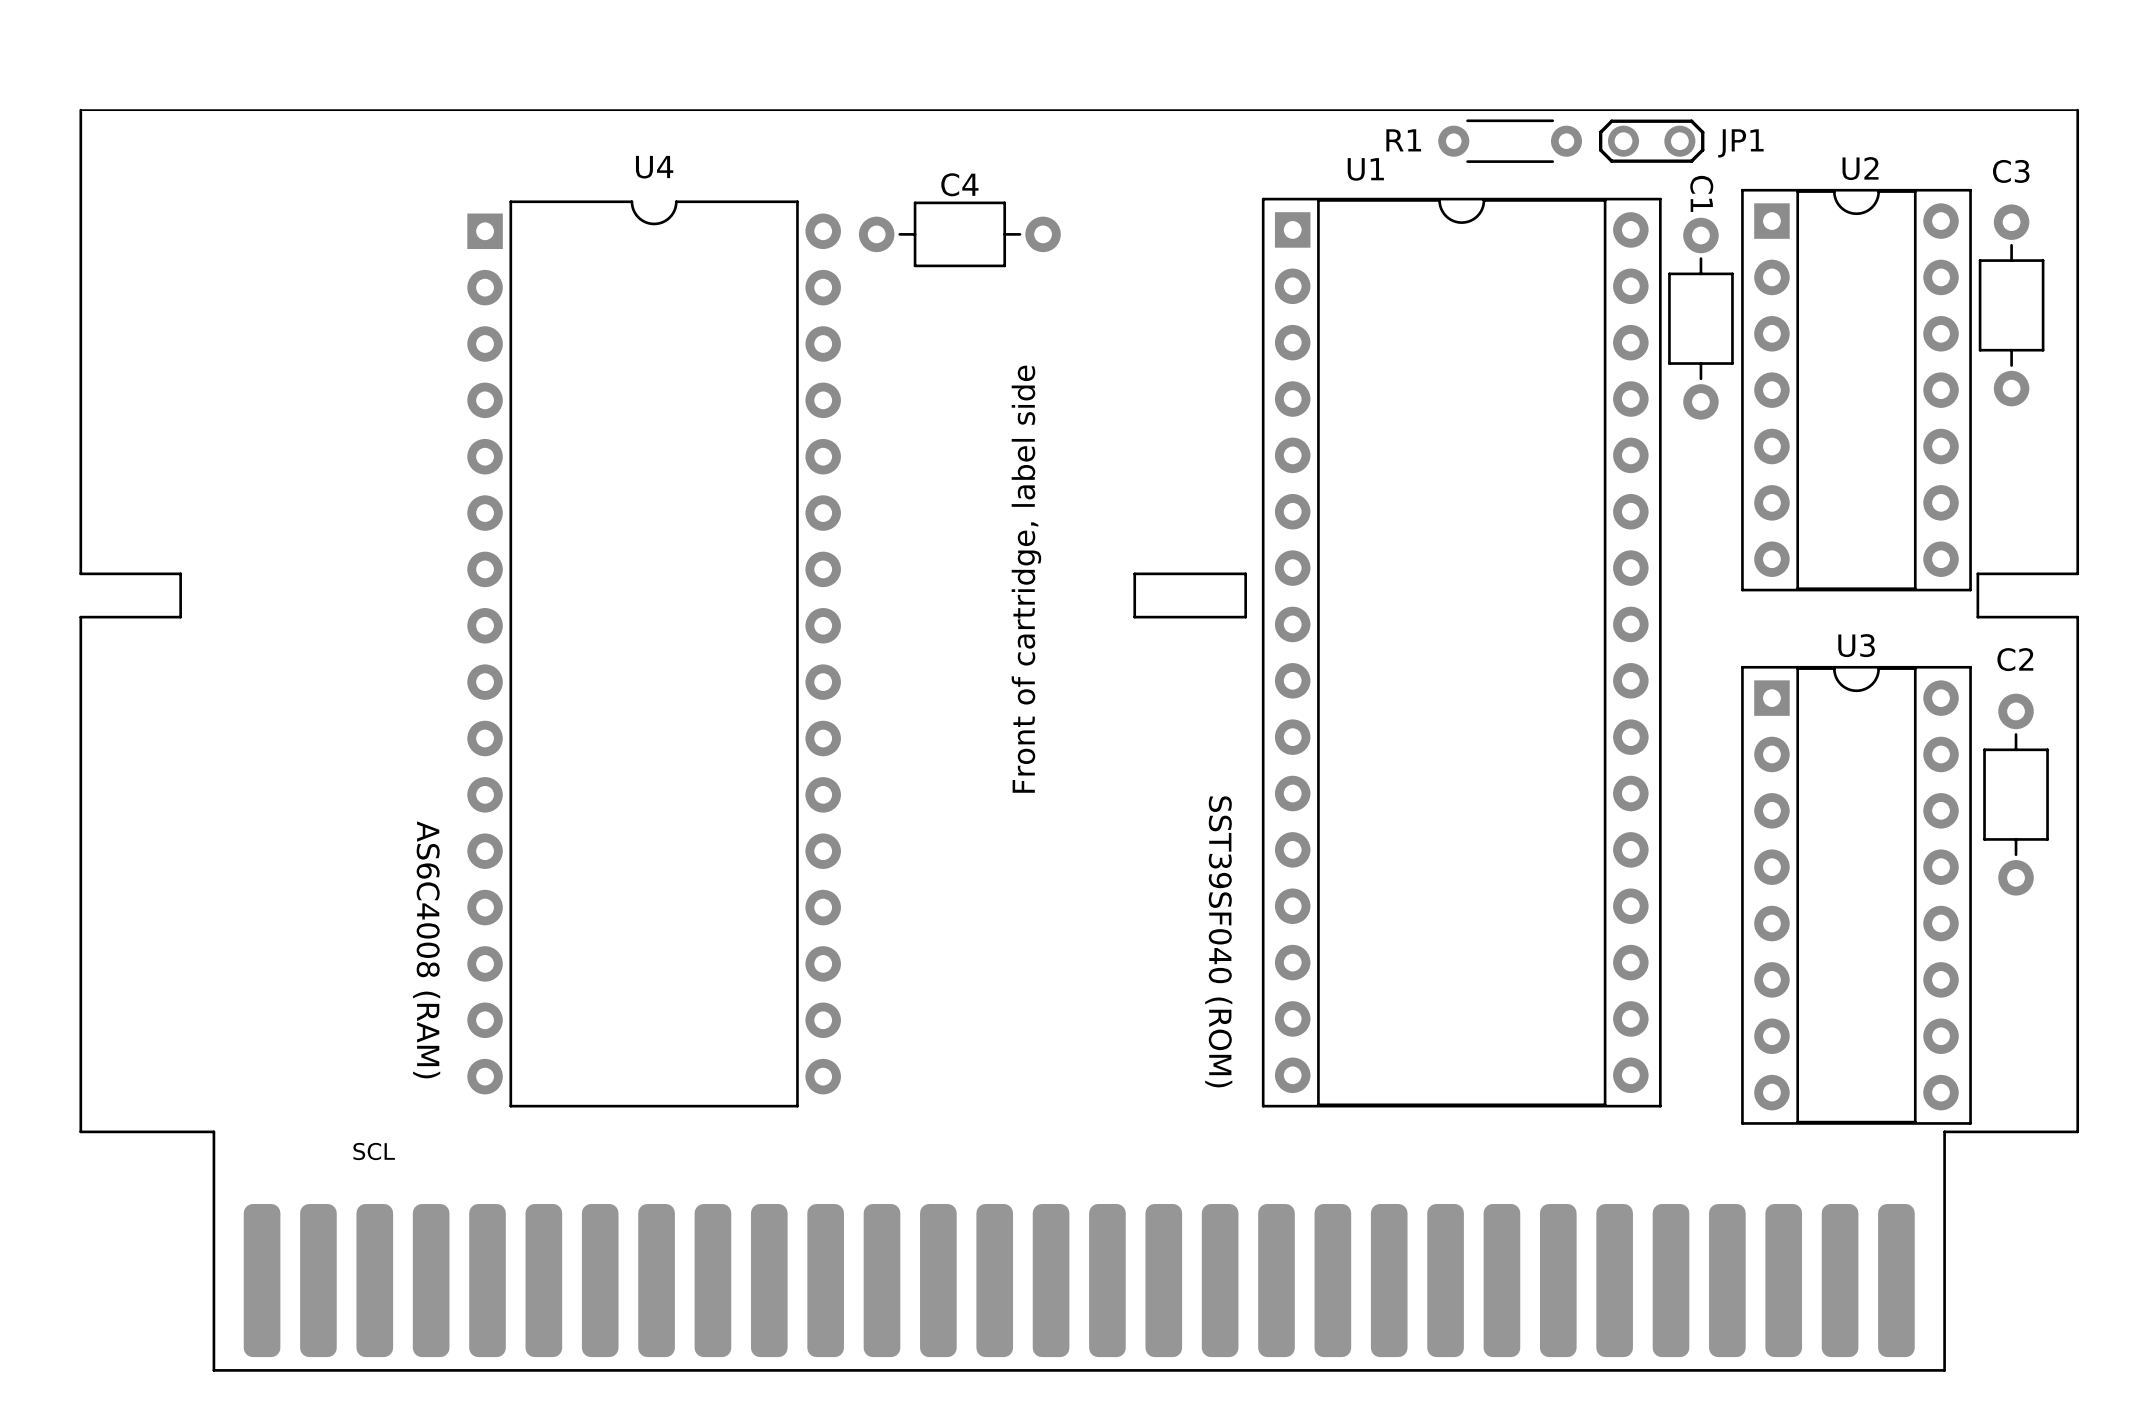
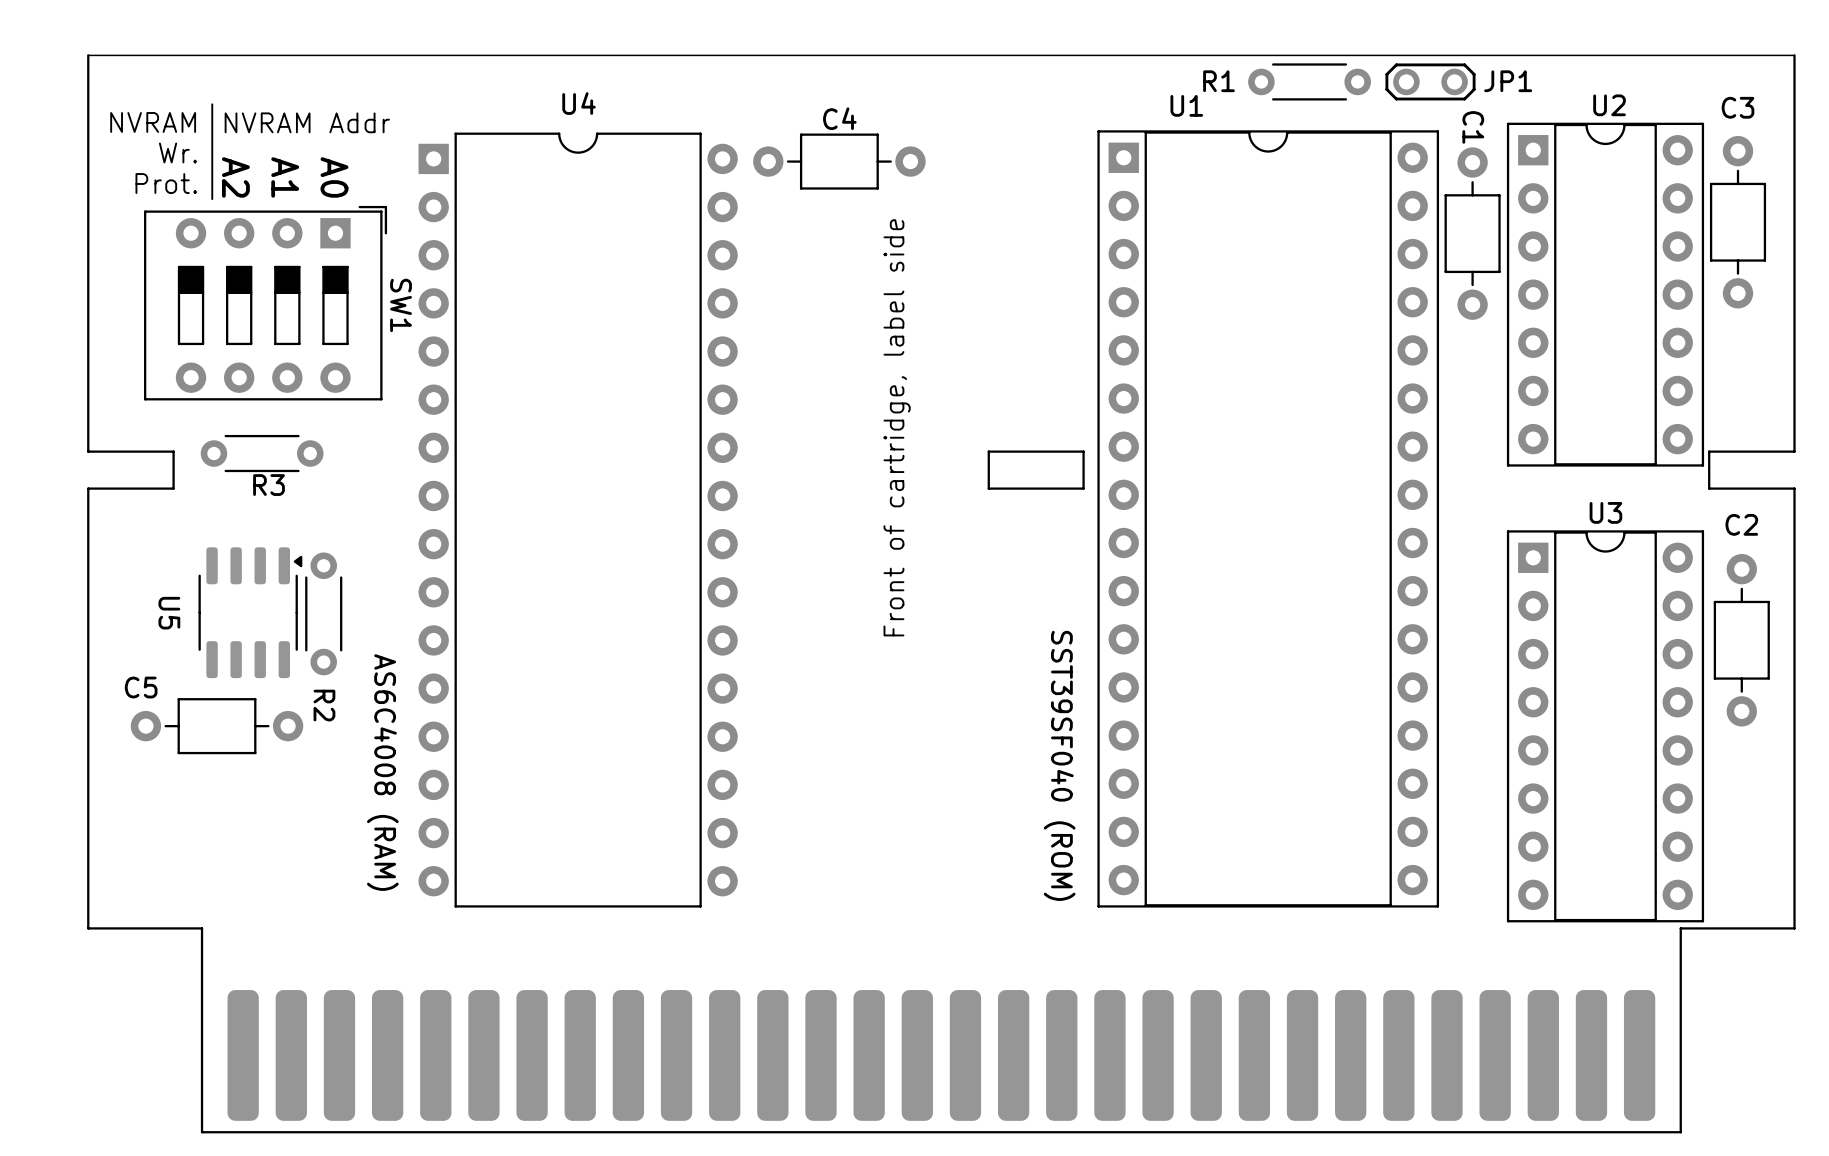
line: none -> (212, 104) (212, 199)
text: none -> NVRAM (153, 122)
text: none -> NVRAM Addr (307, 122)
text: none -> Wr. (177, 152)
text: none -> A2 (235, 177)
text: none -> A1 (285, 177)
text: none -> A0 (334, 177)
text: none -> Prot. (166, 183)
SW1: none -> (265, 303)
R3: none -> (262, 453)
U5: none -> (250, 612)
R2: none -> (323, 613)
C5: none -> (217, 726)
text: SCL (374, 1151) -> none

